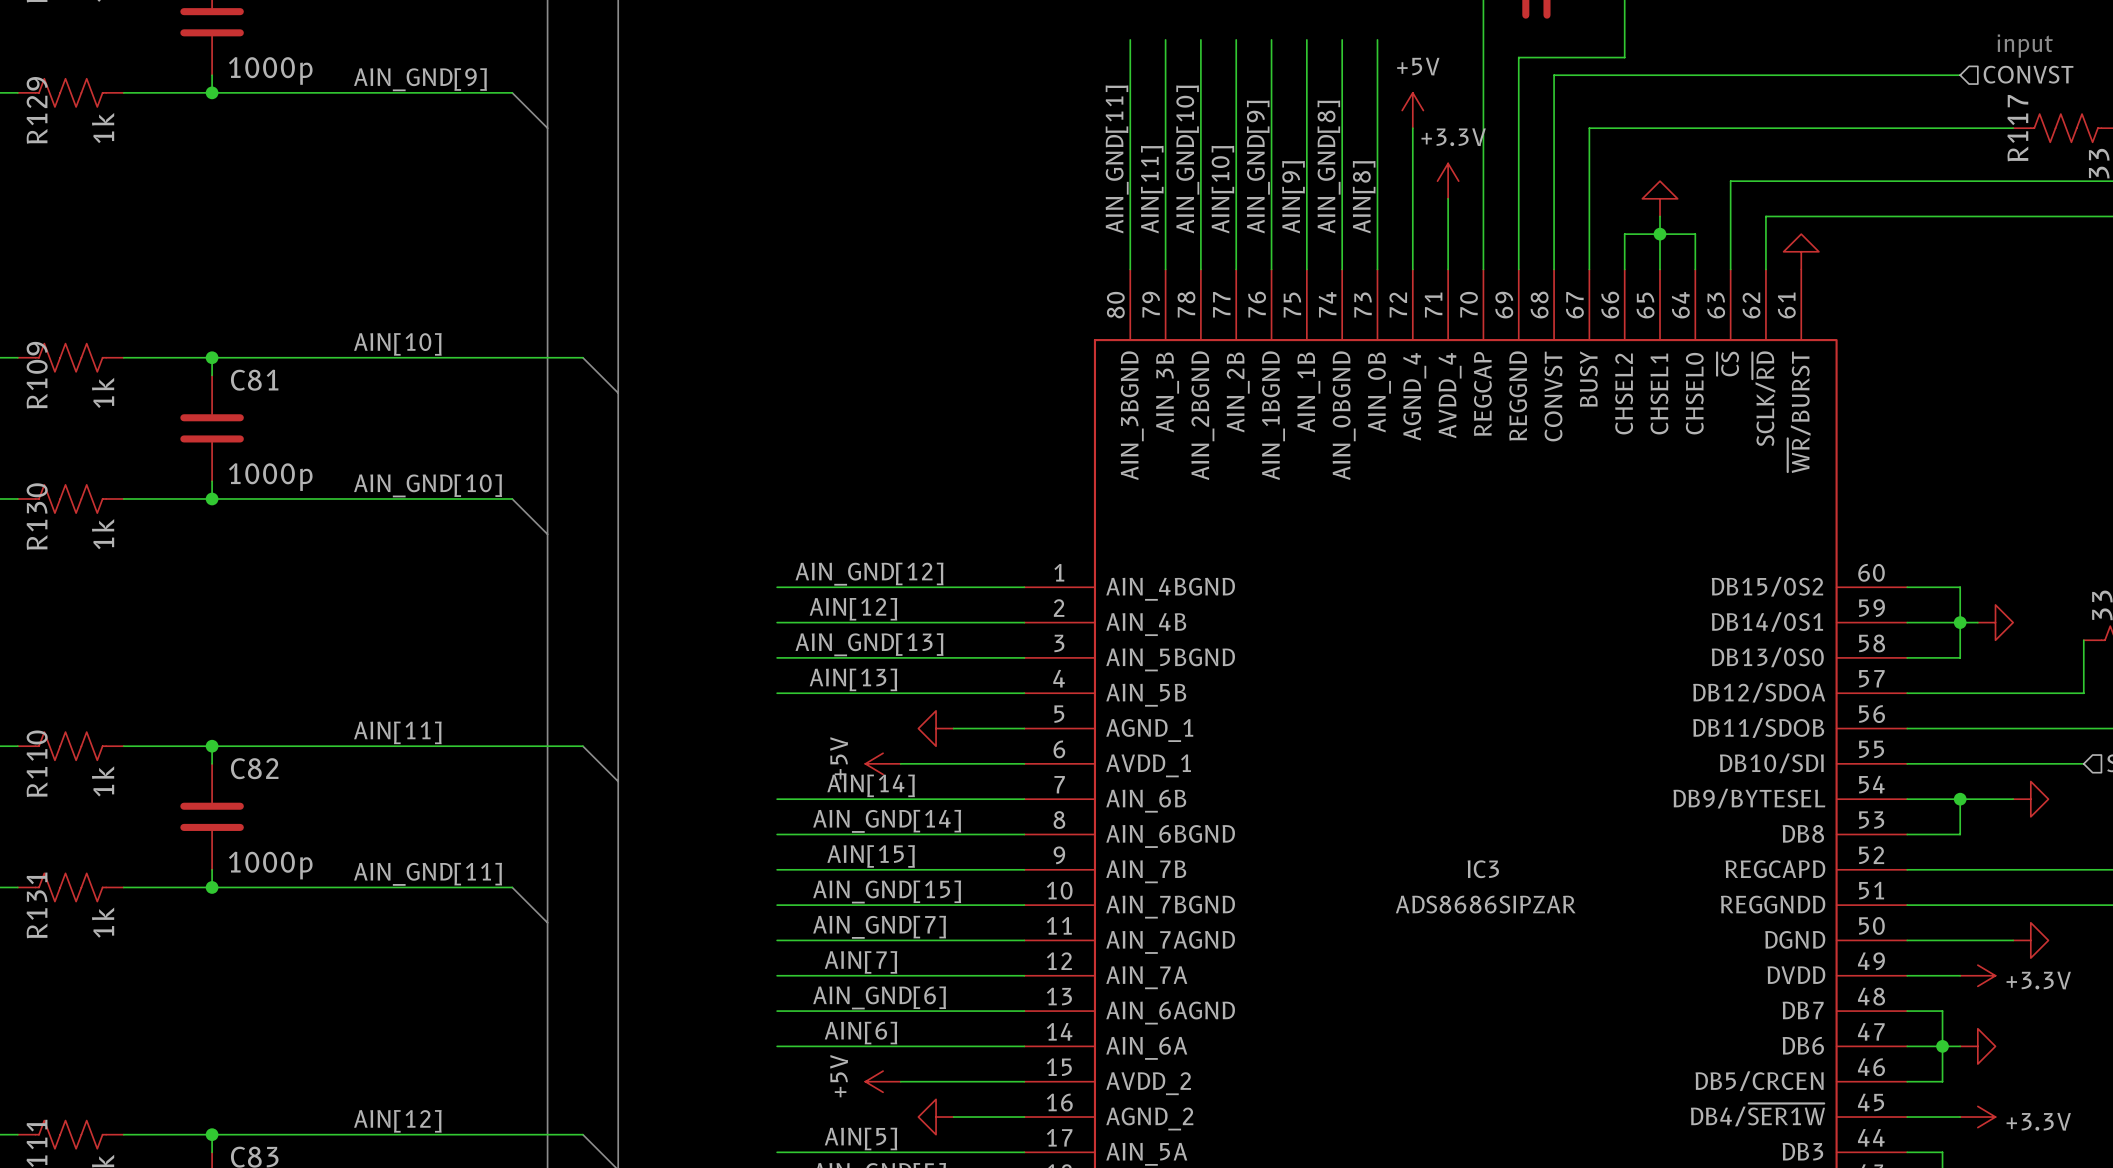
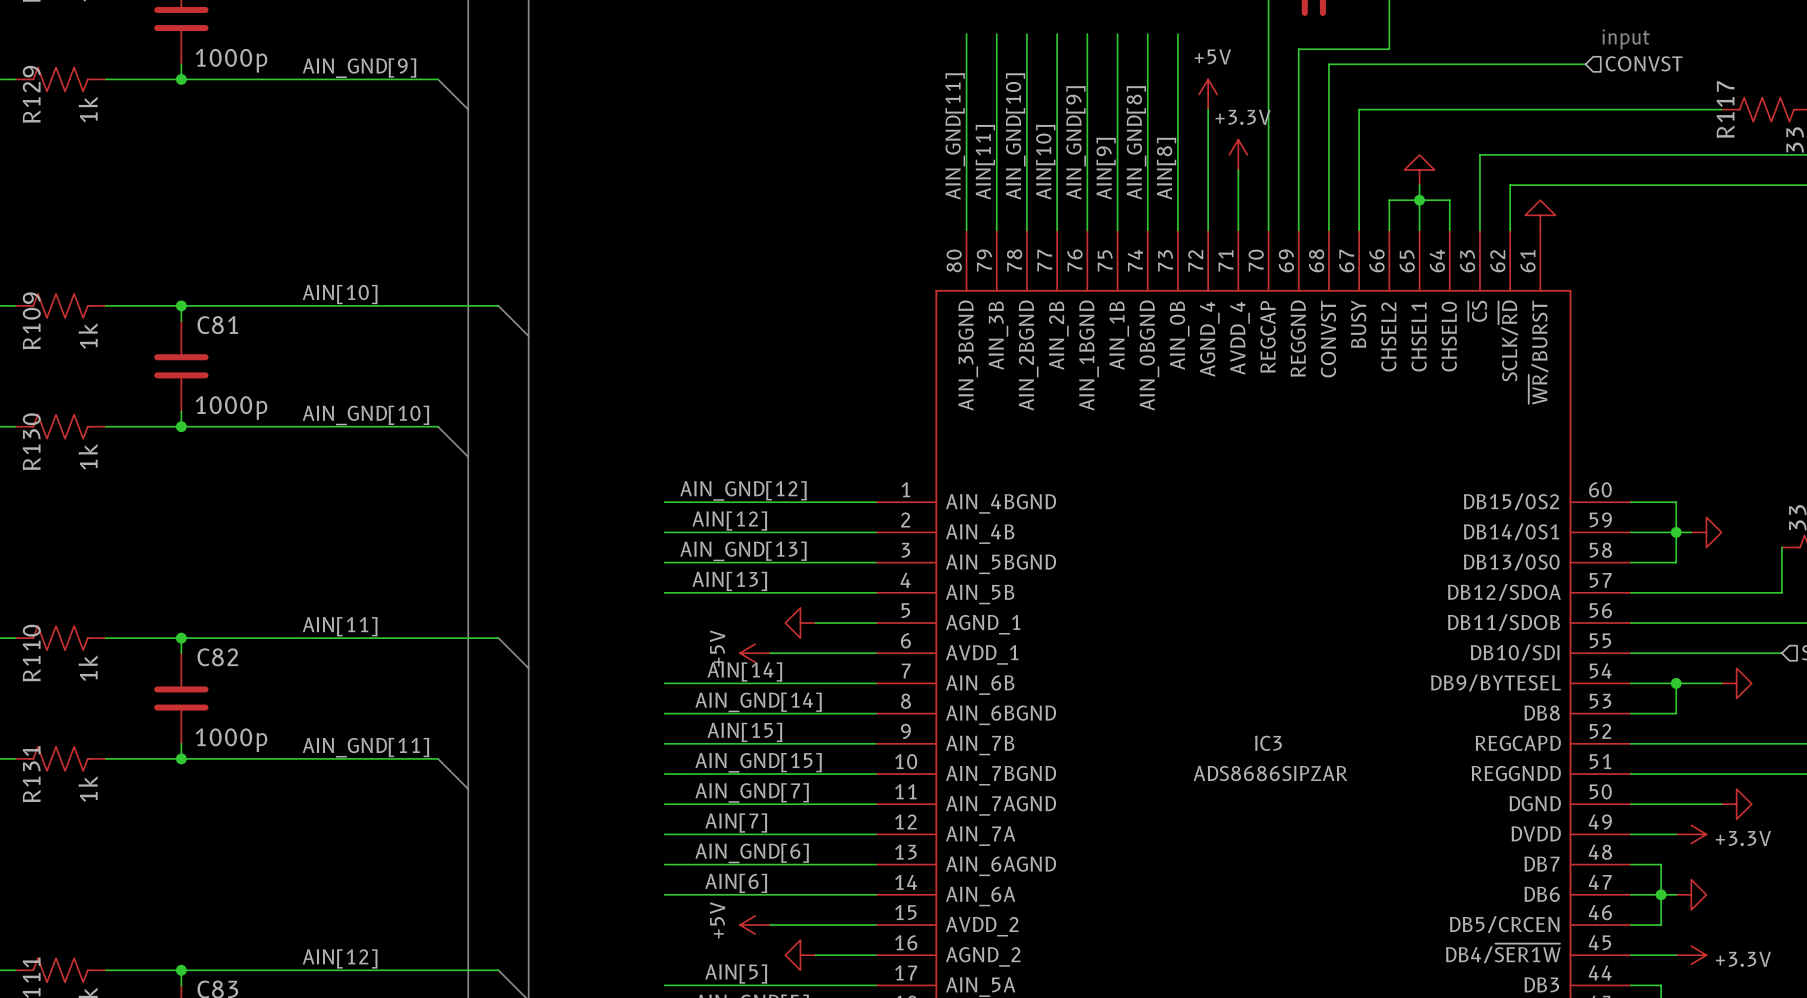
text position: input (2025, 46) -> input (1626, 39)
hierarchical label position: CONVST (2028, 74) -> CONVST (1644, 63)
wire: (1854, 75) (1960, 75) -> none

